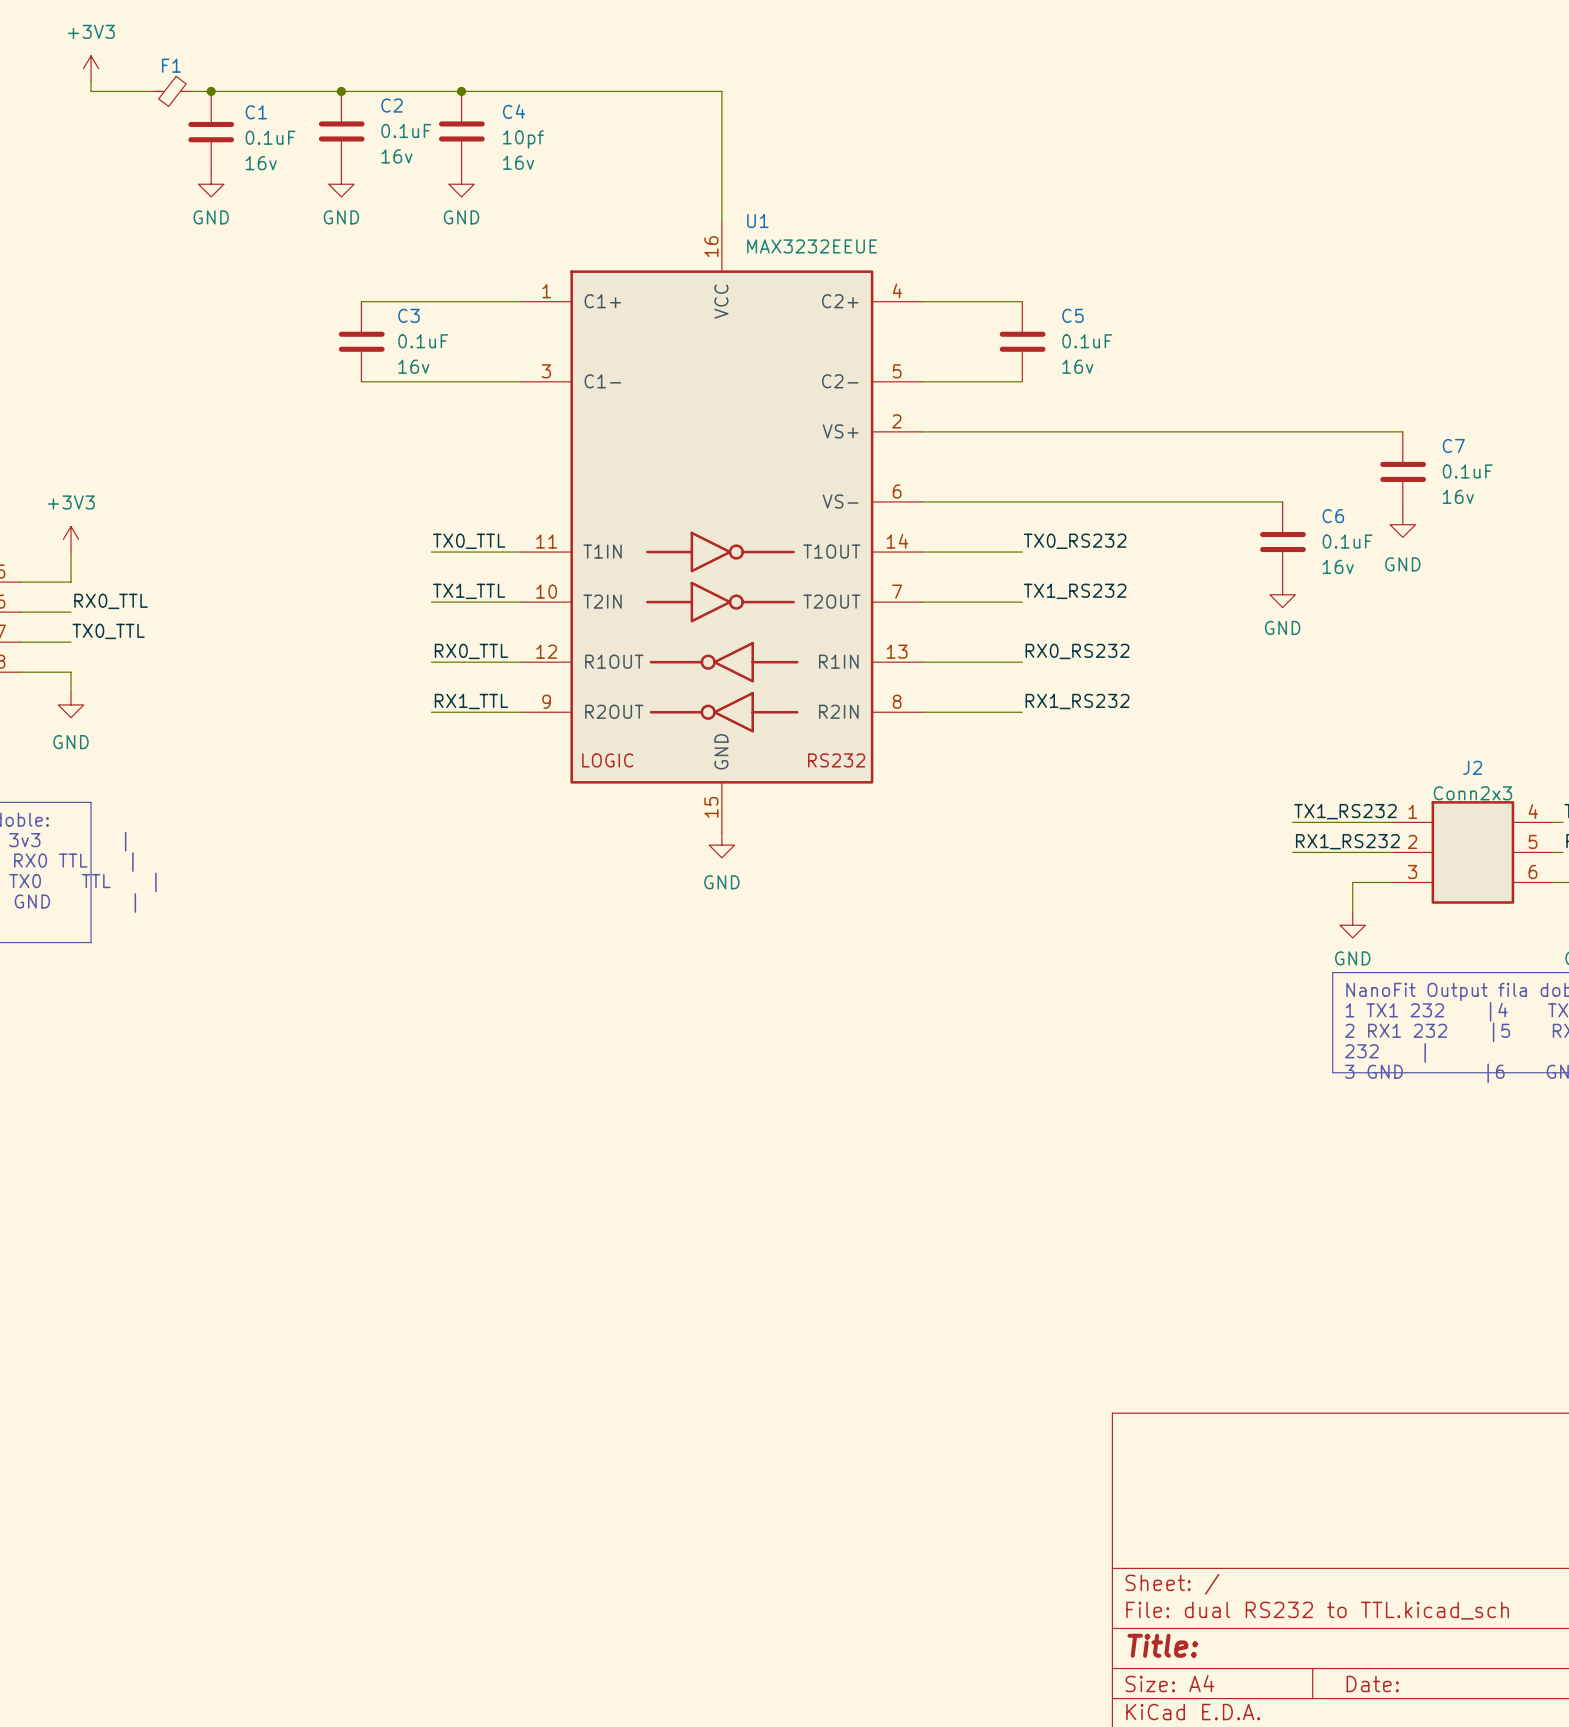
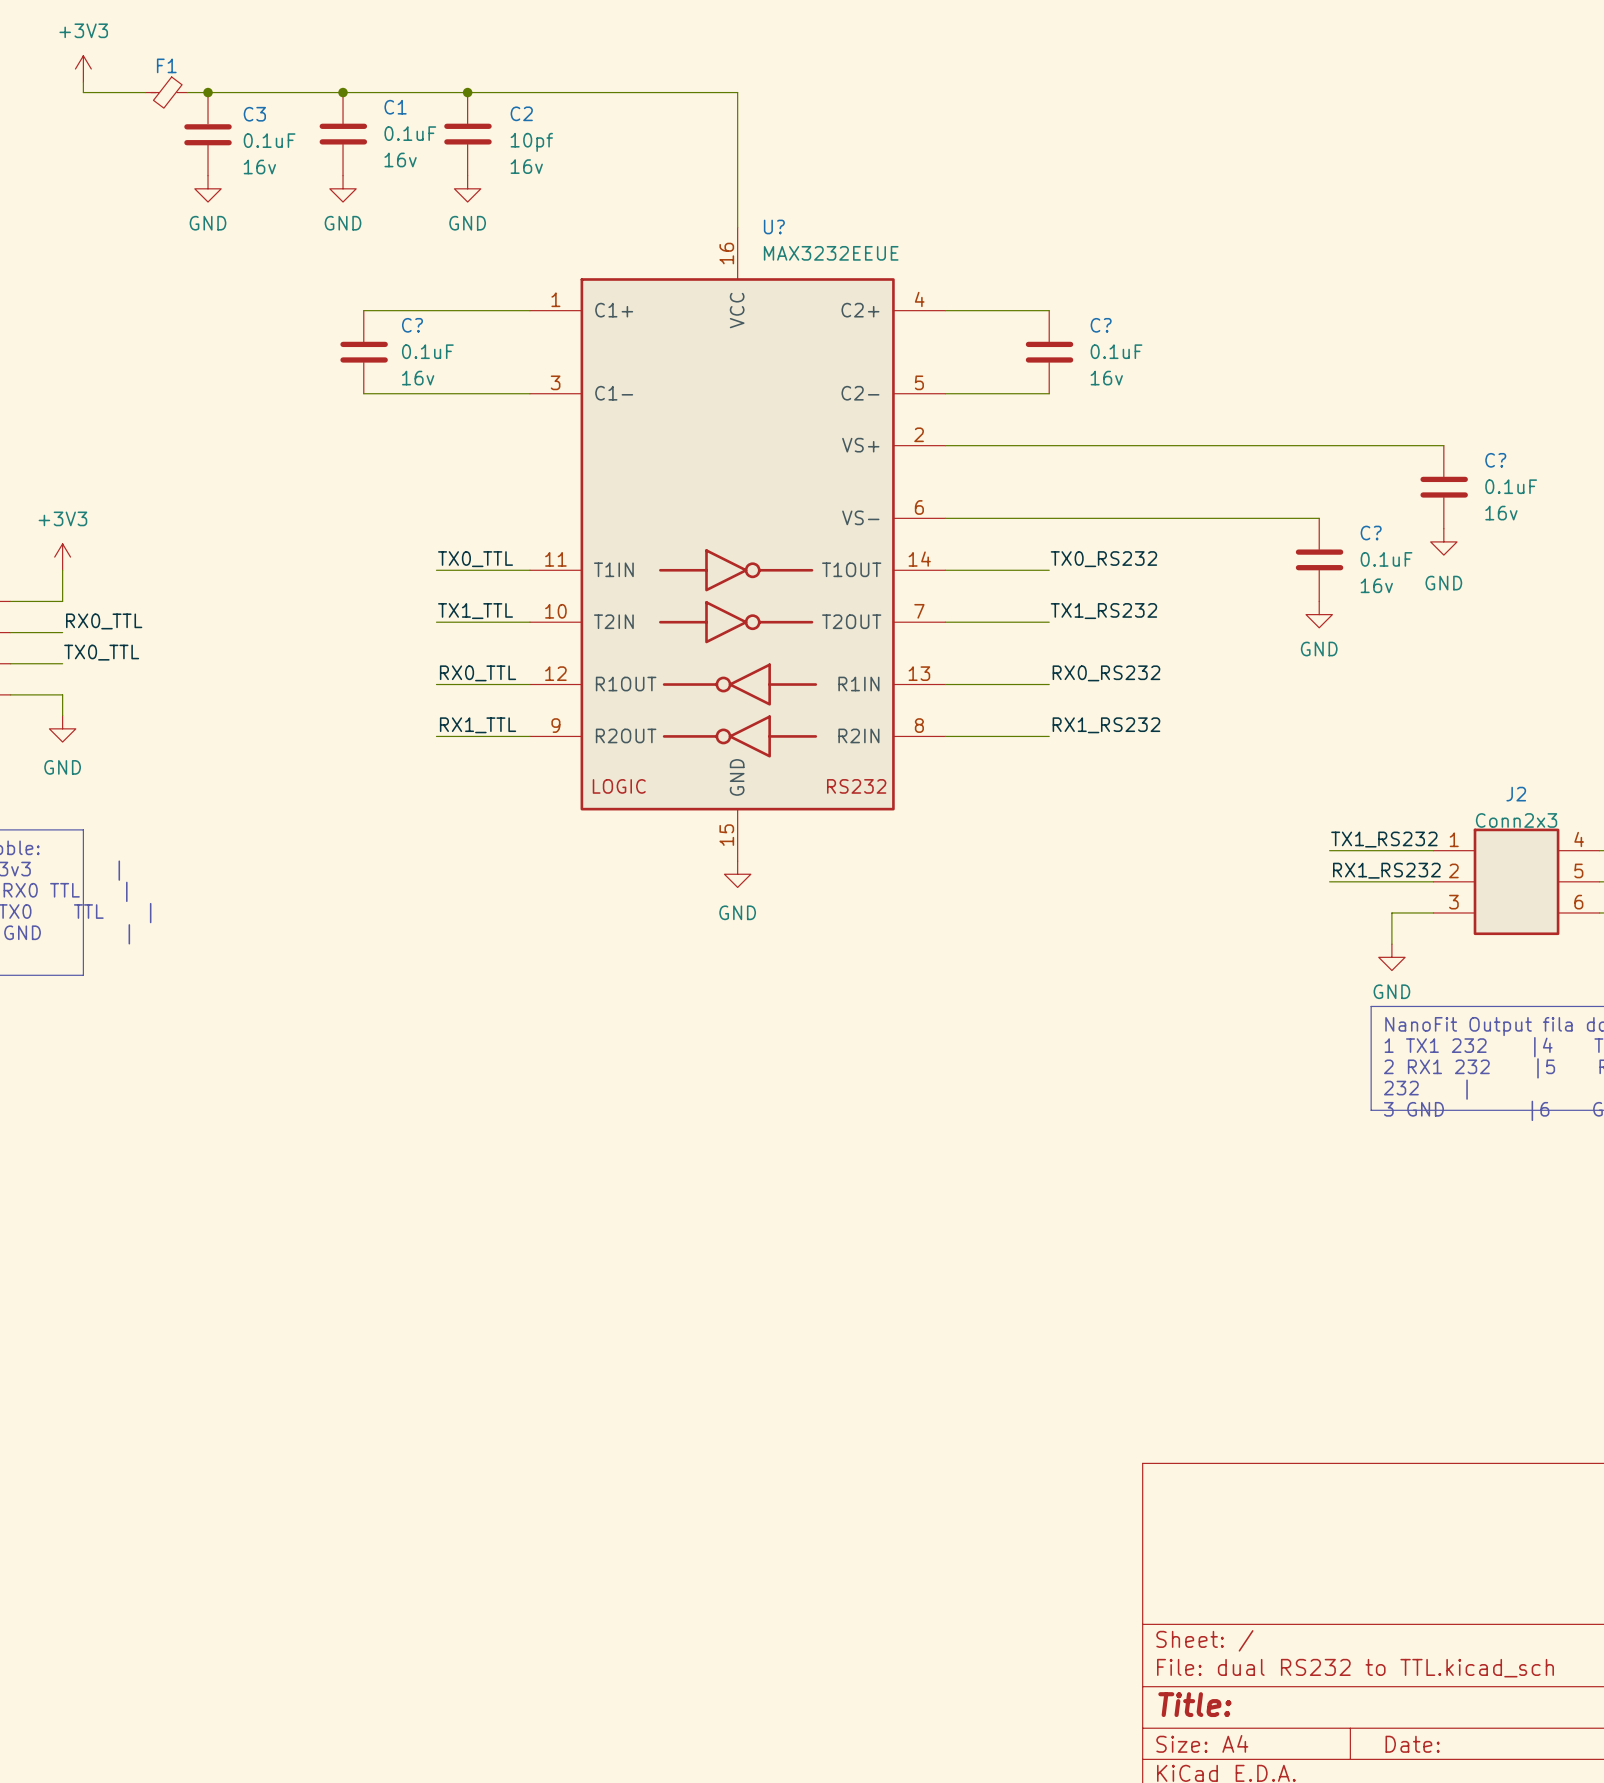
C2 name: C2 (392, 105) -> C1 (395, 107)
C4 name: C4 (514, 111) -> C2 (521, 113)
C1 name: C1 (256, 112) -> C3 (254, 114)
U1 name: U1 (757, 221) -> U? (774, 226)
C3 name: C3 (408, 315) -> C? (412, 325)
C5 name: C5 (1072, 315) -> C? (1101, 325)
C7 name: C7 (1453, 446) -> C? (1495, 460)
C6 name: C6 (1333, 516) -> C? (1371, 533)

